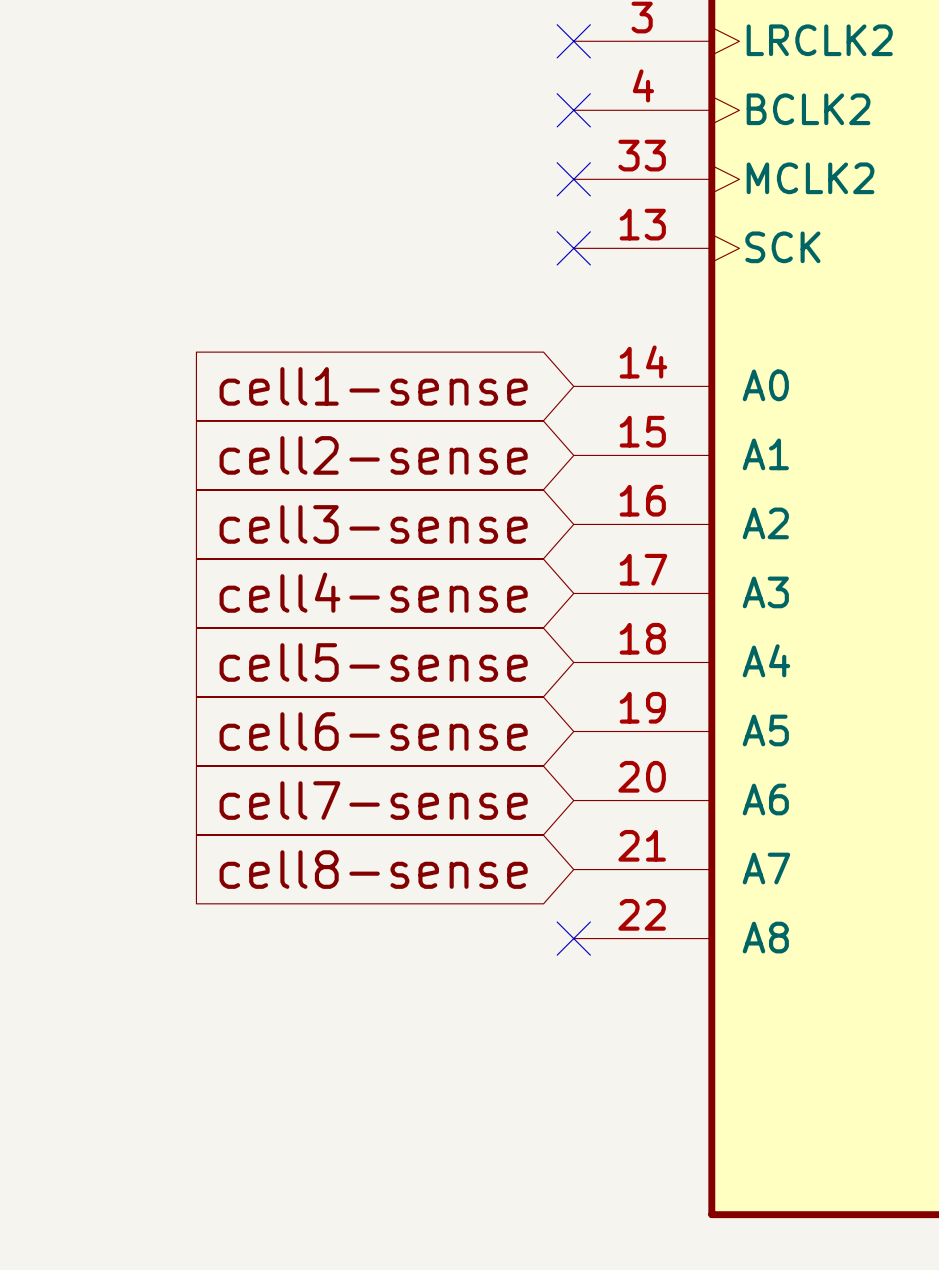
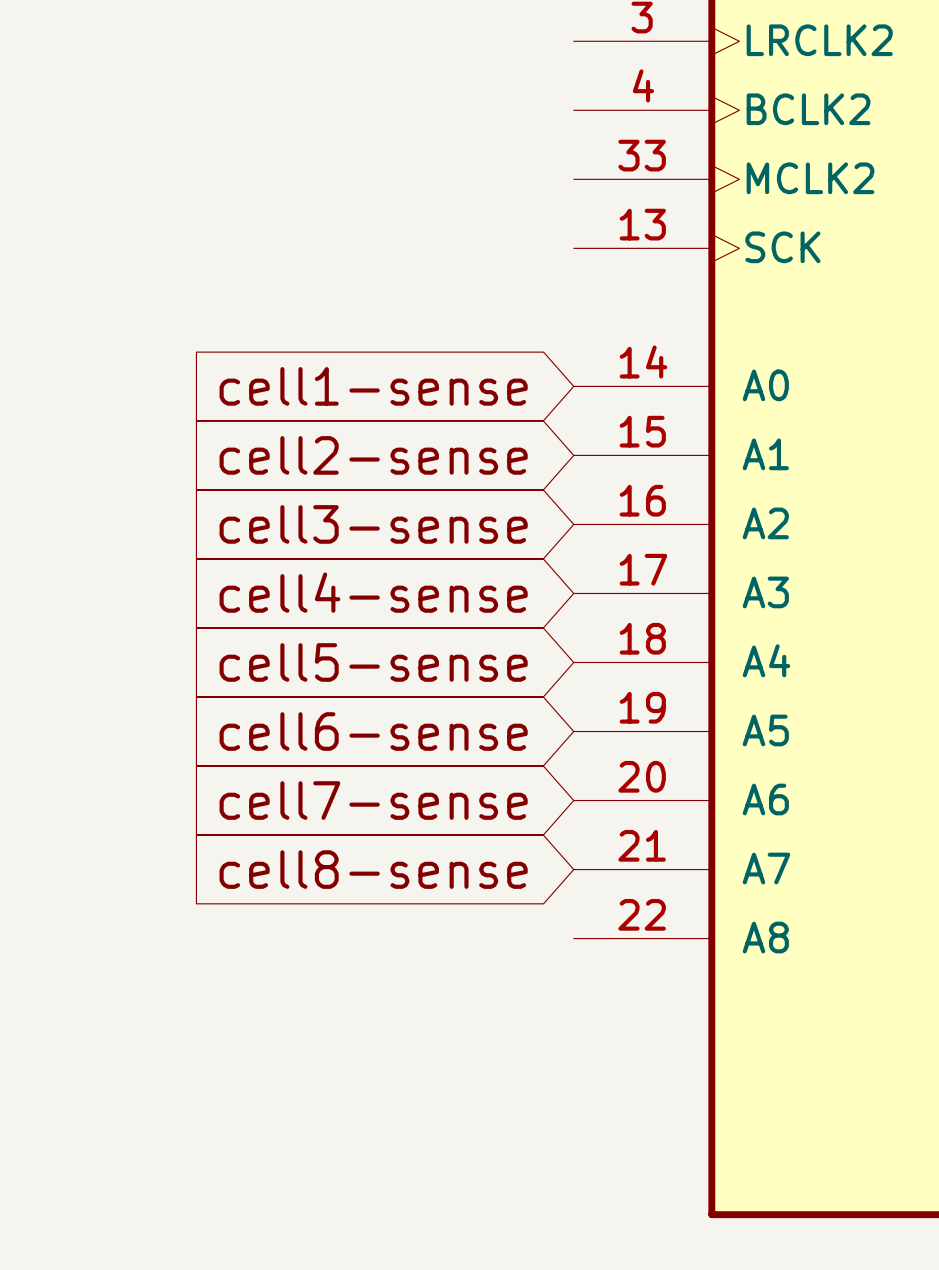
no-connect mark: (573, 41) -> none
no-connect mark: (573, 110) -> none
no-connect mark: (573, 179) -> none
no-connect mark: (573, 248) -> none
no-connect mark: (573, 938) -> none

